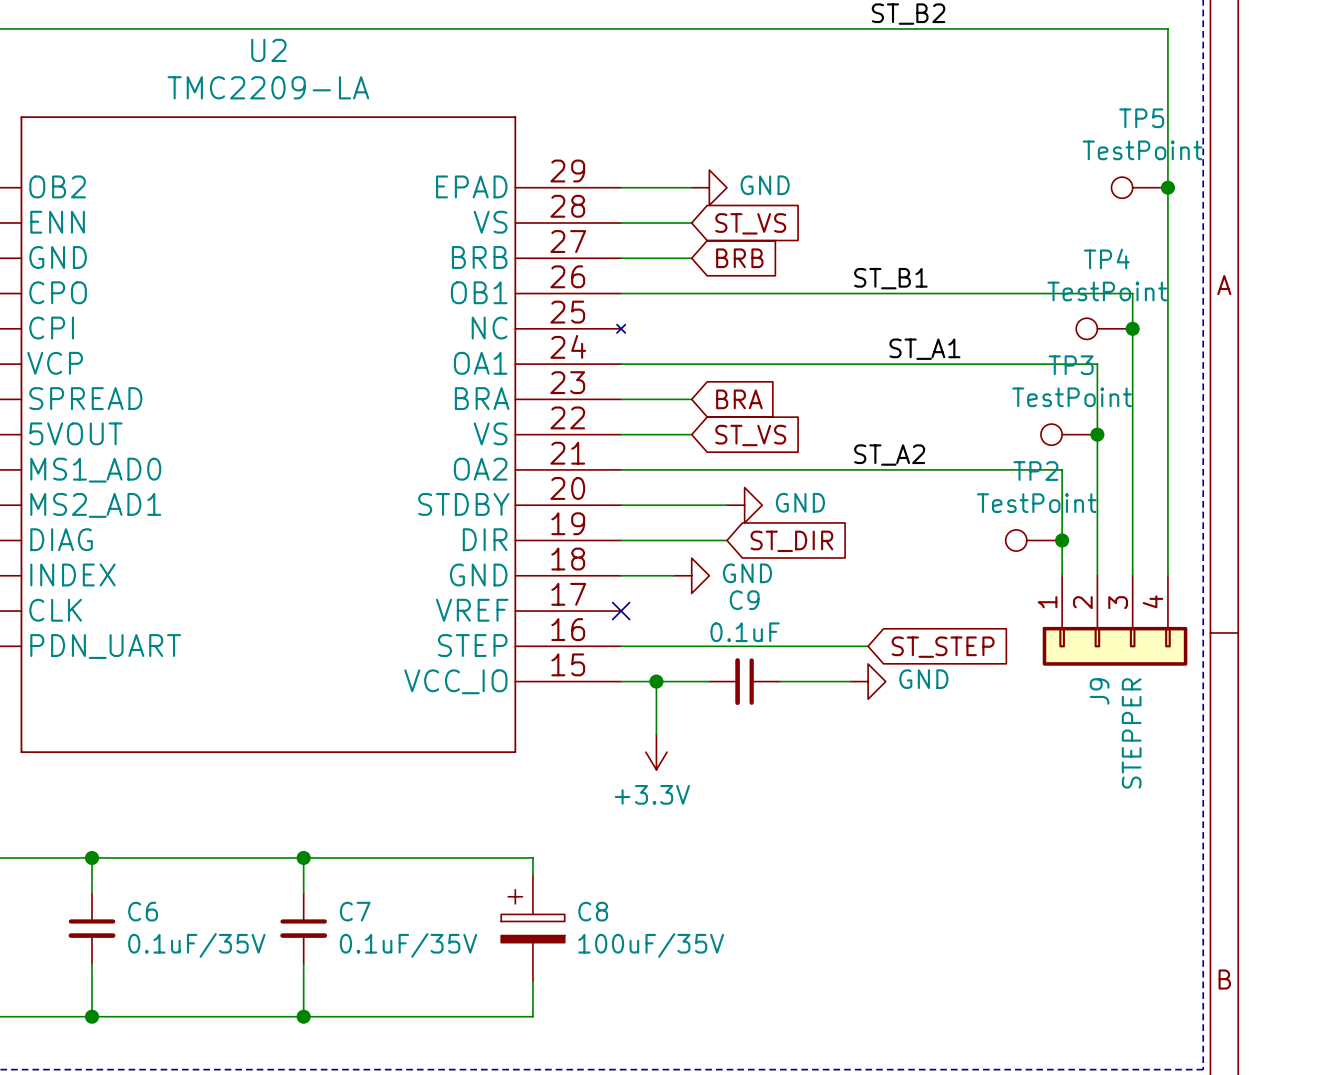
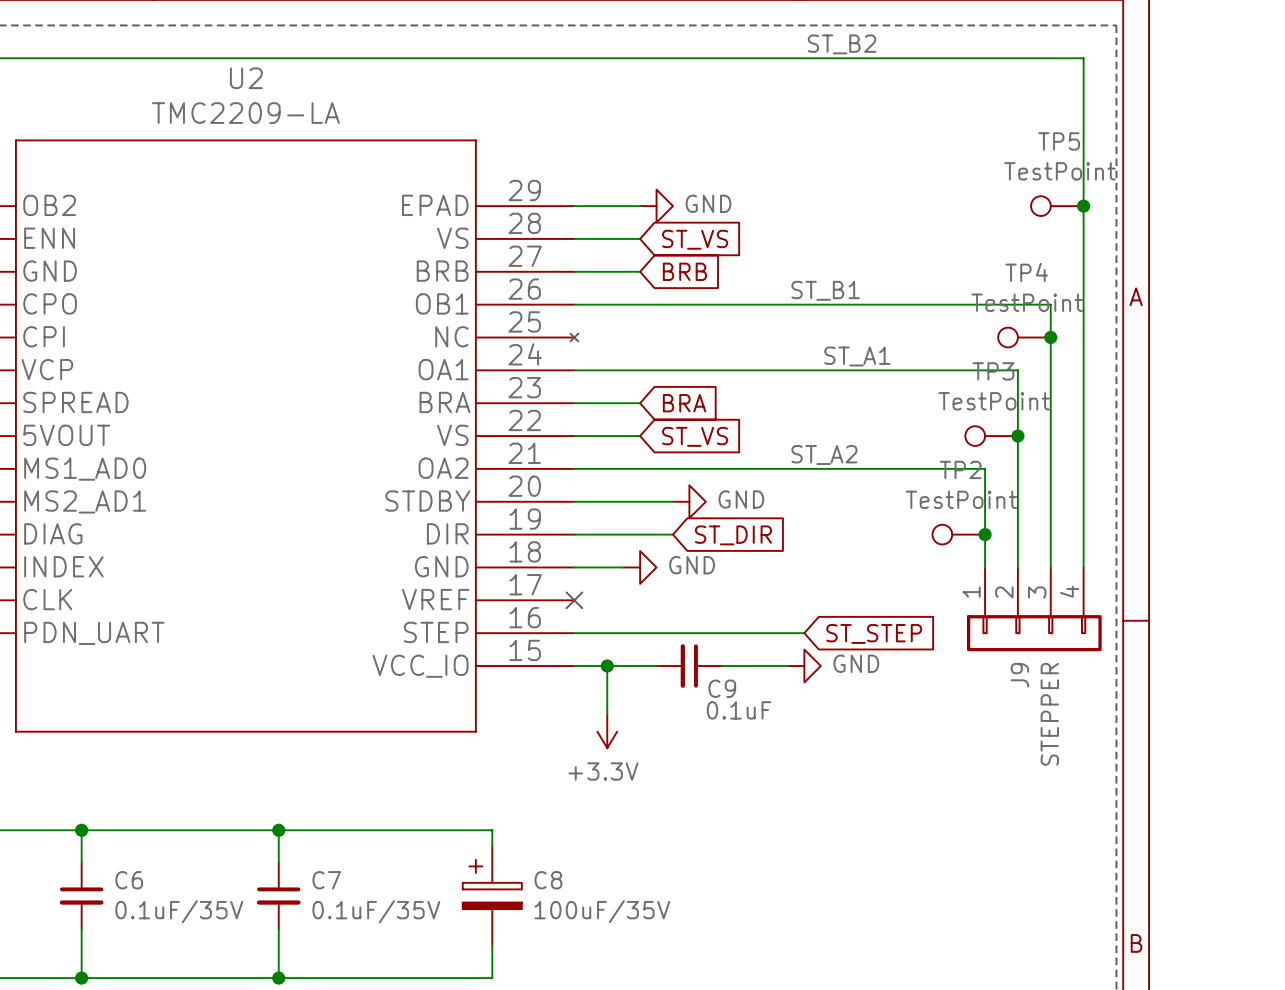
C9 name position: C9 (744, 600) -> C9 (722, 688)
C9 value position: 0.1uF (745, 632) -> 0.1uF (739, 710)

